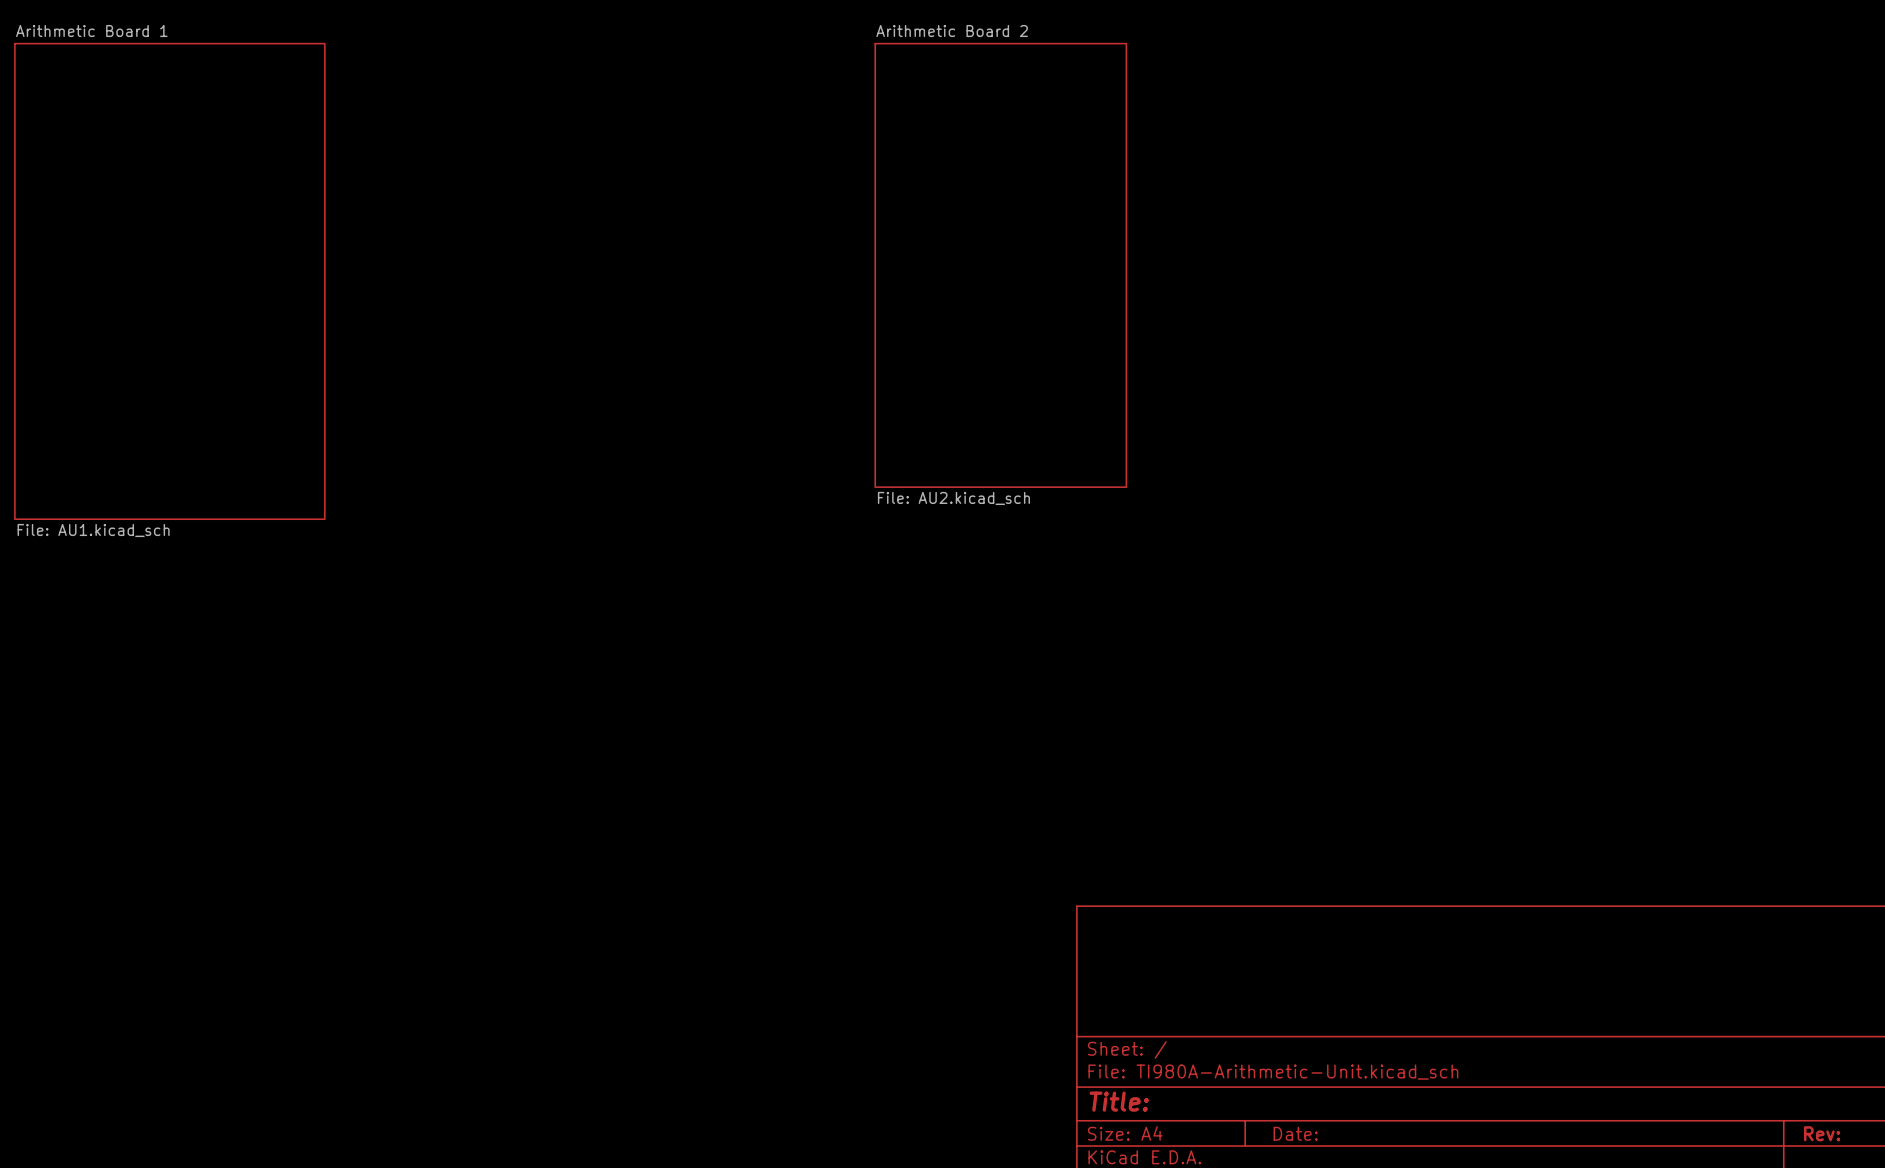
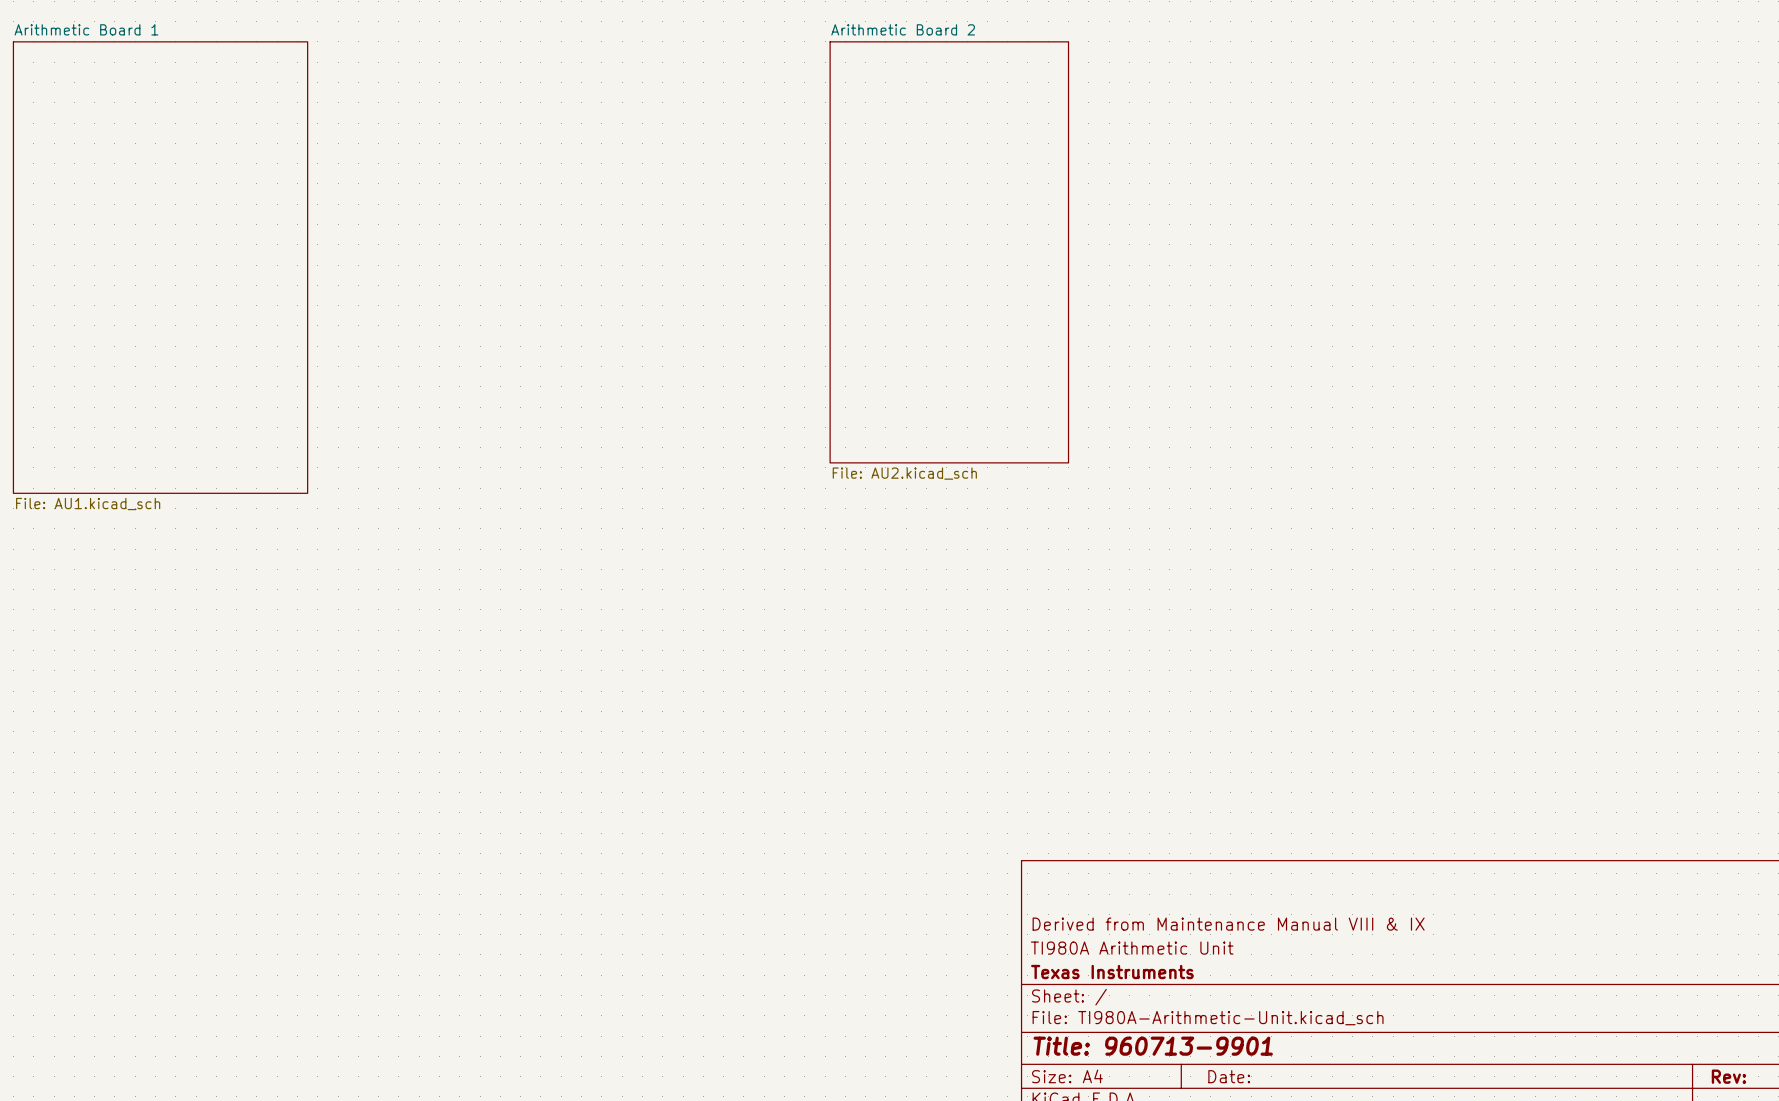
title block: none -> Derived from Maintenance Manual VIII & IX (1228, 924)
title block: none -> TI980A Arithmetic Unit (1132, 948)
title block: none -> Texas Instruments (1112, 972)
title block: Title: (1119, 1101) -> Title: 960713-9901 (1153, 1046)

